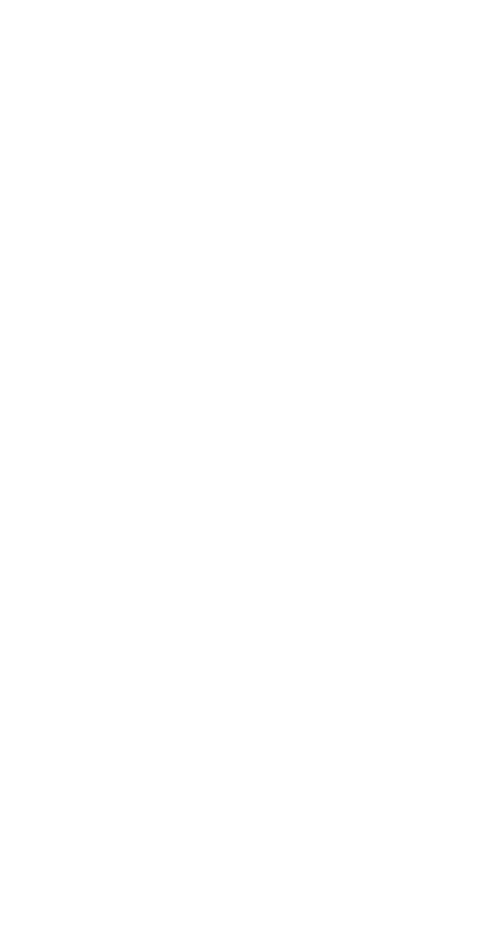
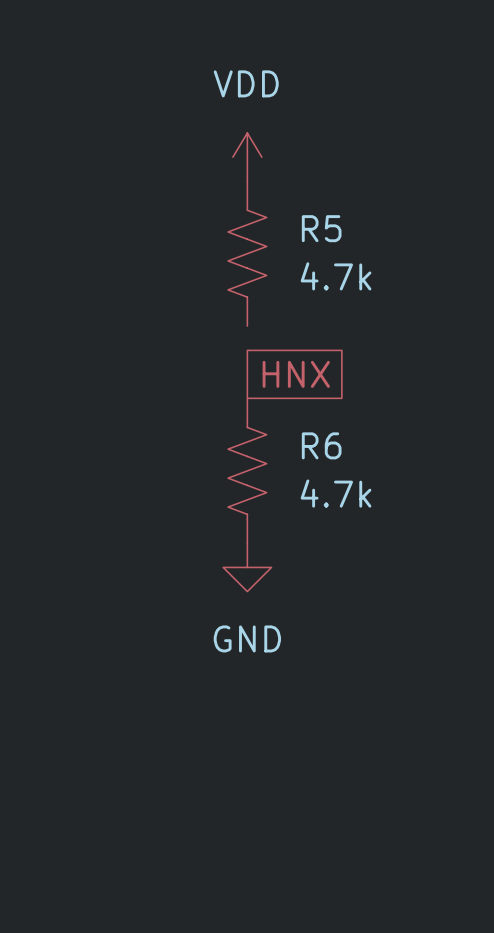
power symbol: none -> VDD (247, 157)
R5: none -> 4.7k (247, 253)
global label: none -> HNX (296, 374)
R6: none -> 4.7k (247, 470)
power symbol: none -> GND (247, 567)

